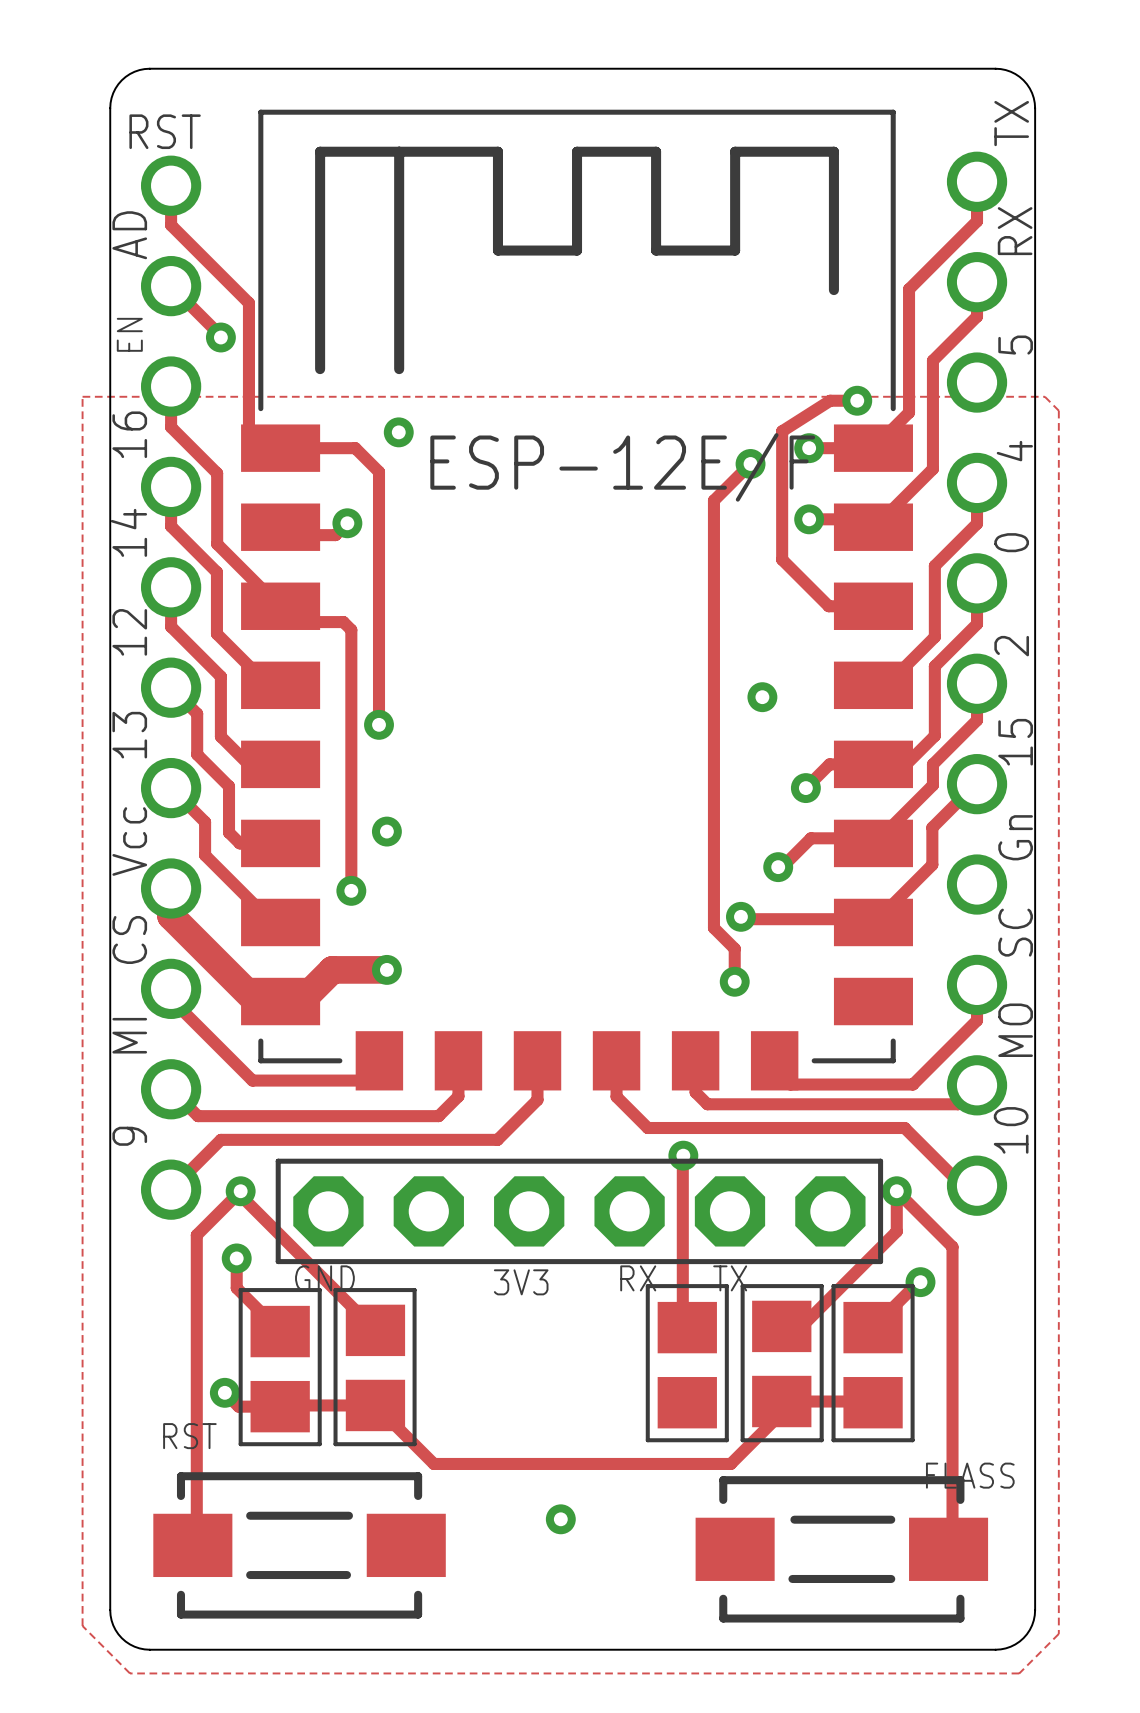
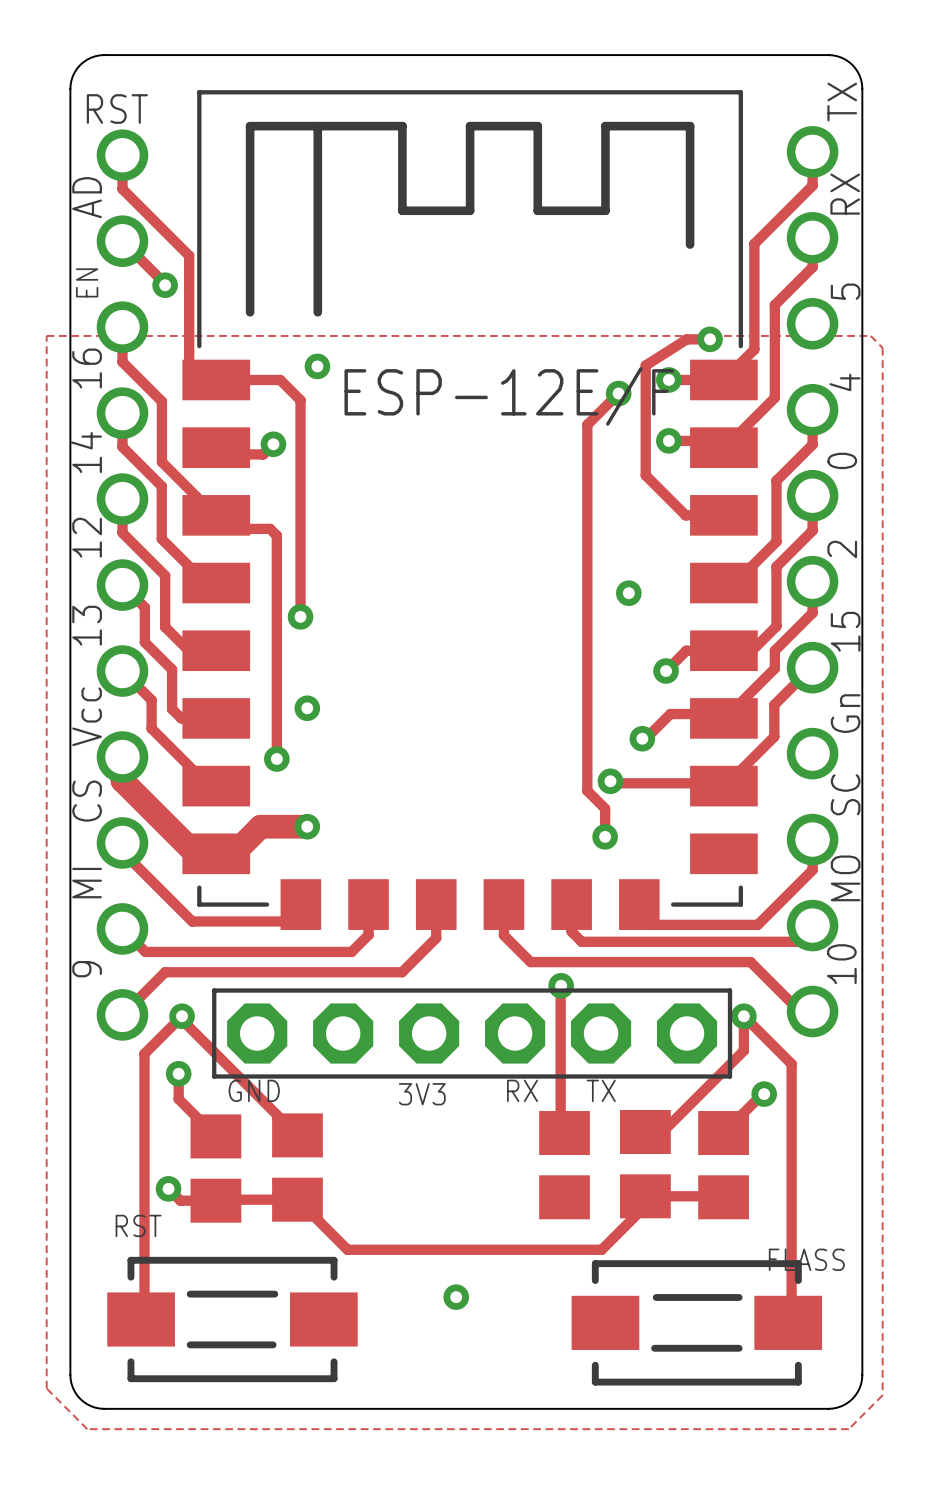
line: (647, 1286) (726, 1286) (726, 1440) (647, 1440) (647, 1286) -> none
line: (742, 1286) (821, 1286) (821, 1440) (742, 1440) (742, 1286) -> none
line: (833, 1286) (912, 1286) (912, 1440) (833, 1440) (833, 1286) -> none
line: (240, 1290) (319, 1290) (319, 1444) (240, 1444) (240, 1290) -> none
line: (335, 1290) (414, 1290) (414, 1444) (335, 1444) (335, 1290) -> none

